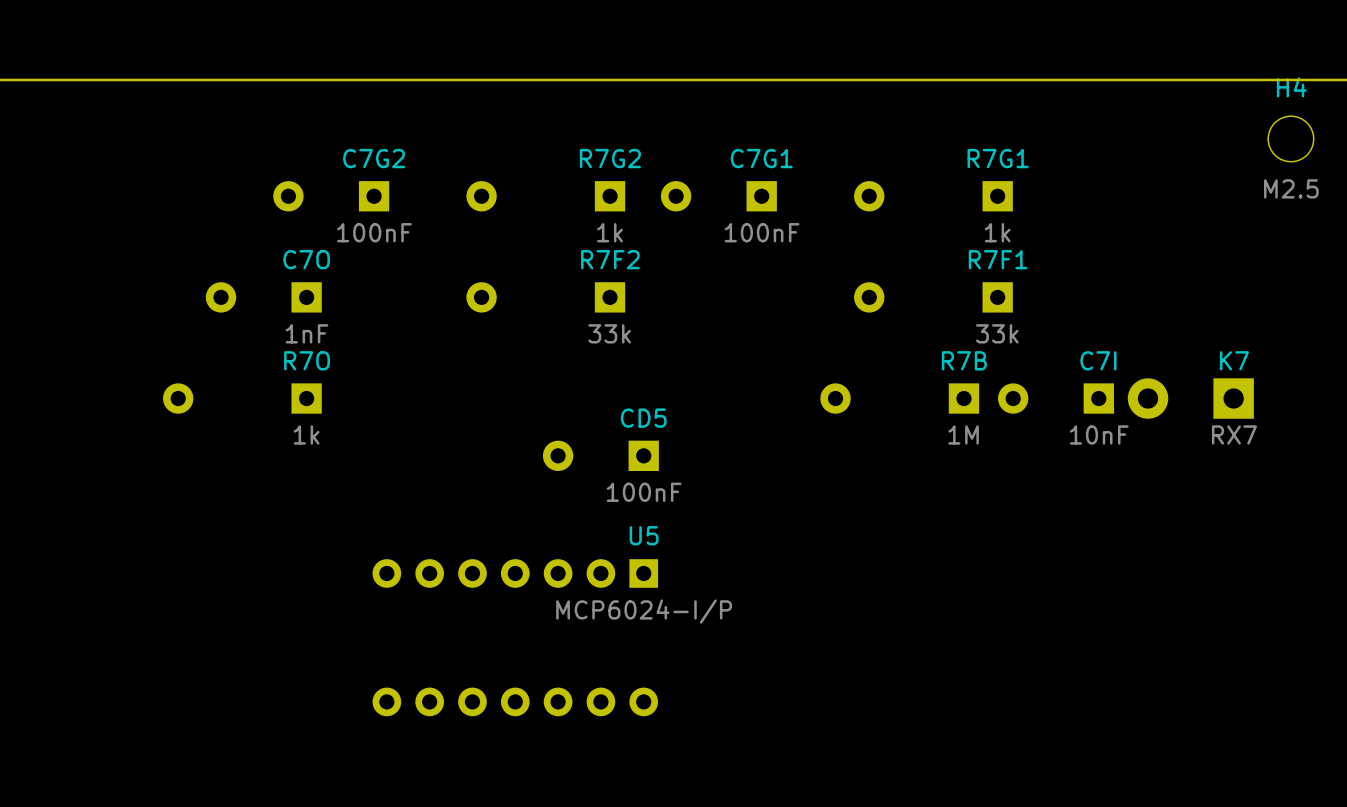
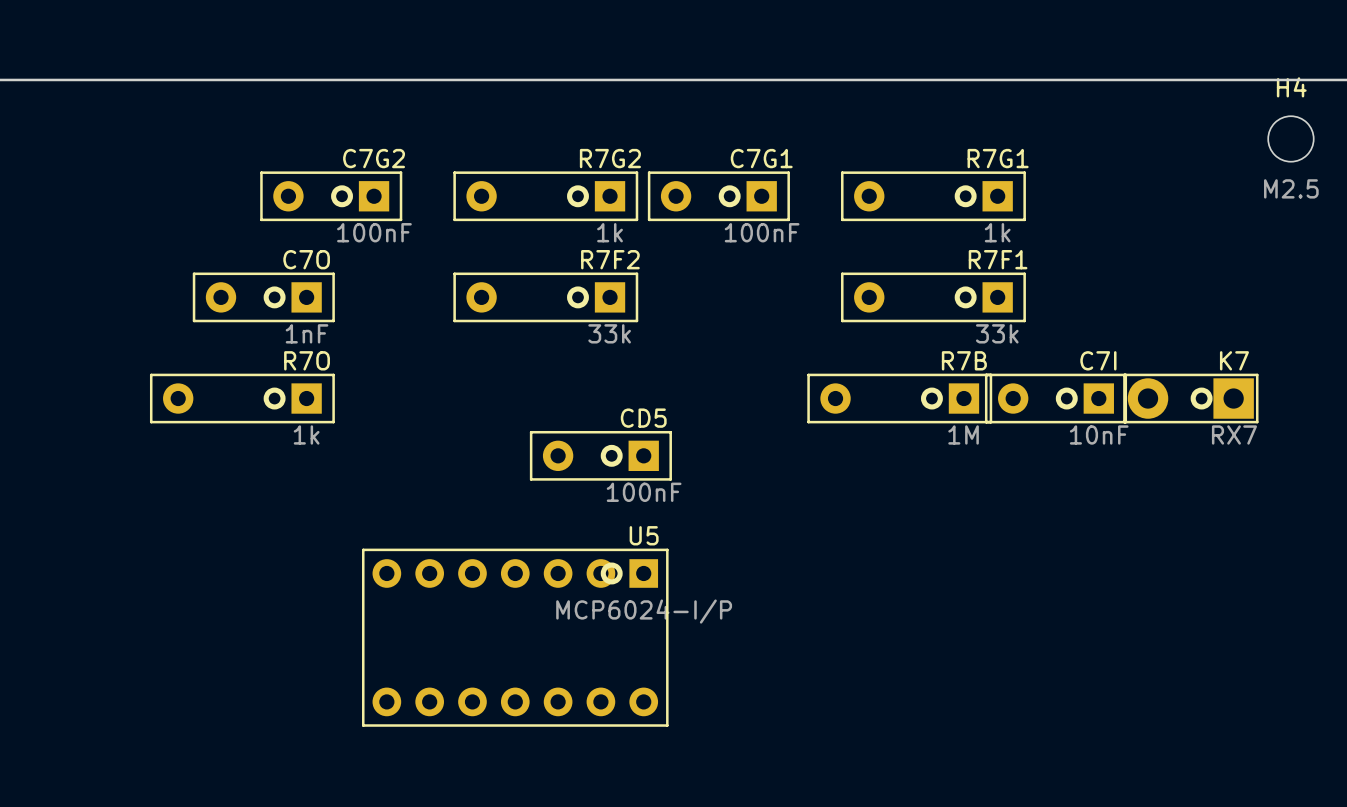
C7G2 footprint: [273, 181, 390, 212] -> [260, 171, 403, 222]
R7G2 footprint: [466, 181, 626, 212] -> [453, 171, 639, 222]
C7G1 footprint: [660, 181, 777, 212] -> [647, 171, 790, 222]
R7G1 footprint: [854, 181, 1013, 212] -> [841, 171, 1026, 222]
C7O footprint: [205, 282, 322, 313] -> [192, 272, 335, 323]
R7F2 footprint: [466, 282, 626, 313] -> [453, 272, 639, 323]
R7F1 footprint: [854, 282, 1013, 313] -> [841, 272, 1026, 323]
K7 footprint: [1127, 378, 1254, 419] -> [1123, 373, 1259, 424]
R7O footprint: [163, 383, 322, 414] -> [149, 373, 335, 424]
R7B footprint: [820, 383, 980, 414] -> [807, 373, 993, 424]
C7I footprint: [998, 383, 1114, 414] -> [984, 373, 1128, 424]
CD5 footprint: [542, 440, 659, 472] -> [529, 430, 672, 481]
U5 footprint: [372, 559, 659, 717] -> [362, 548, 669, 727]

